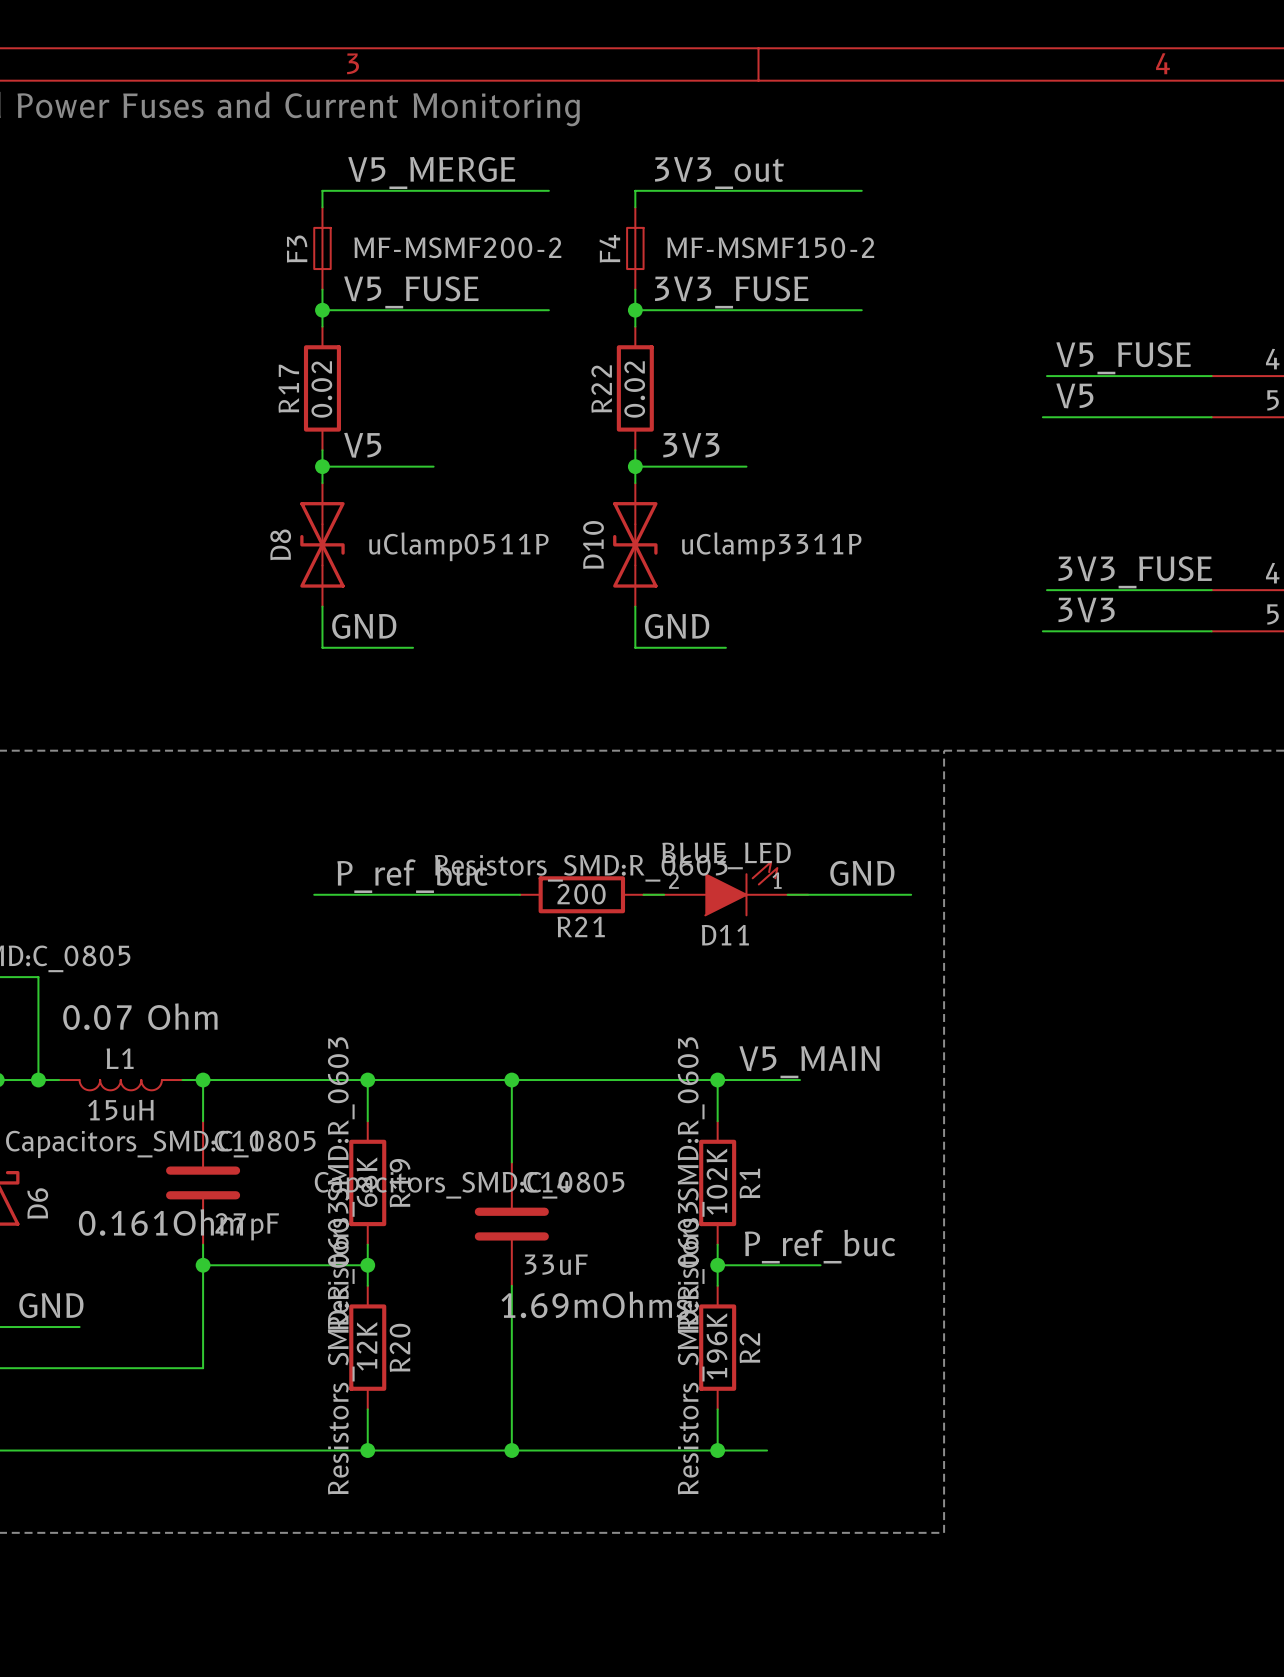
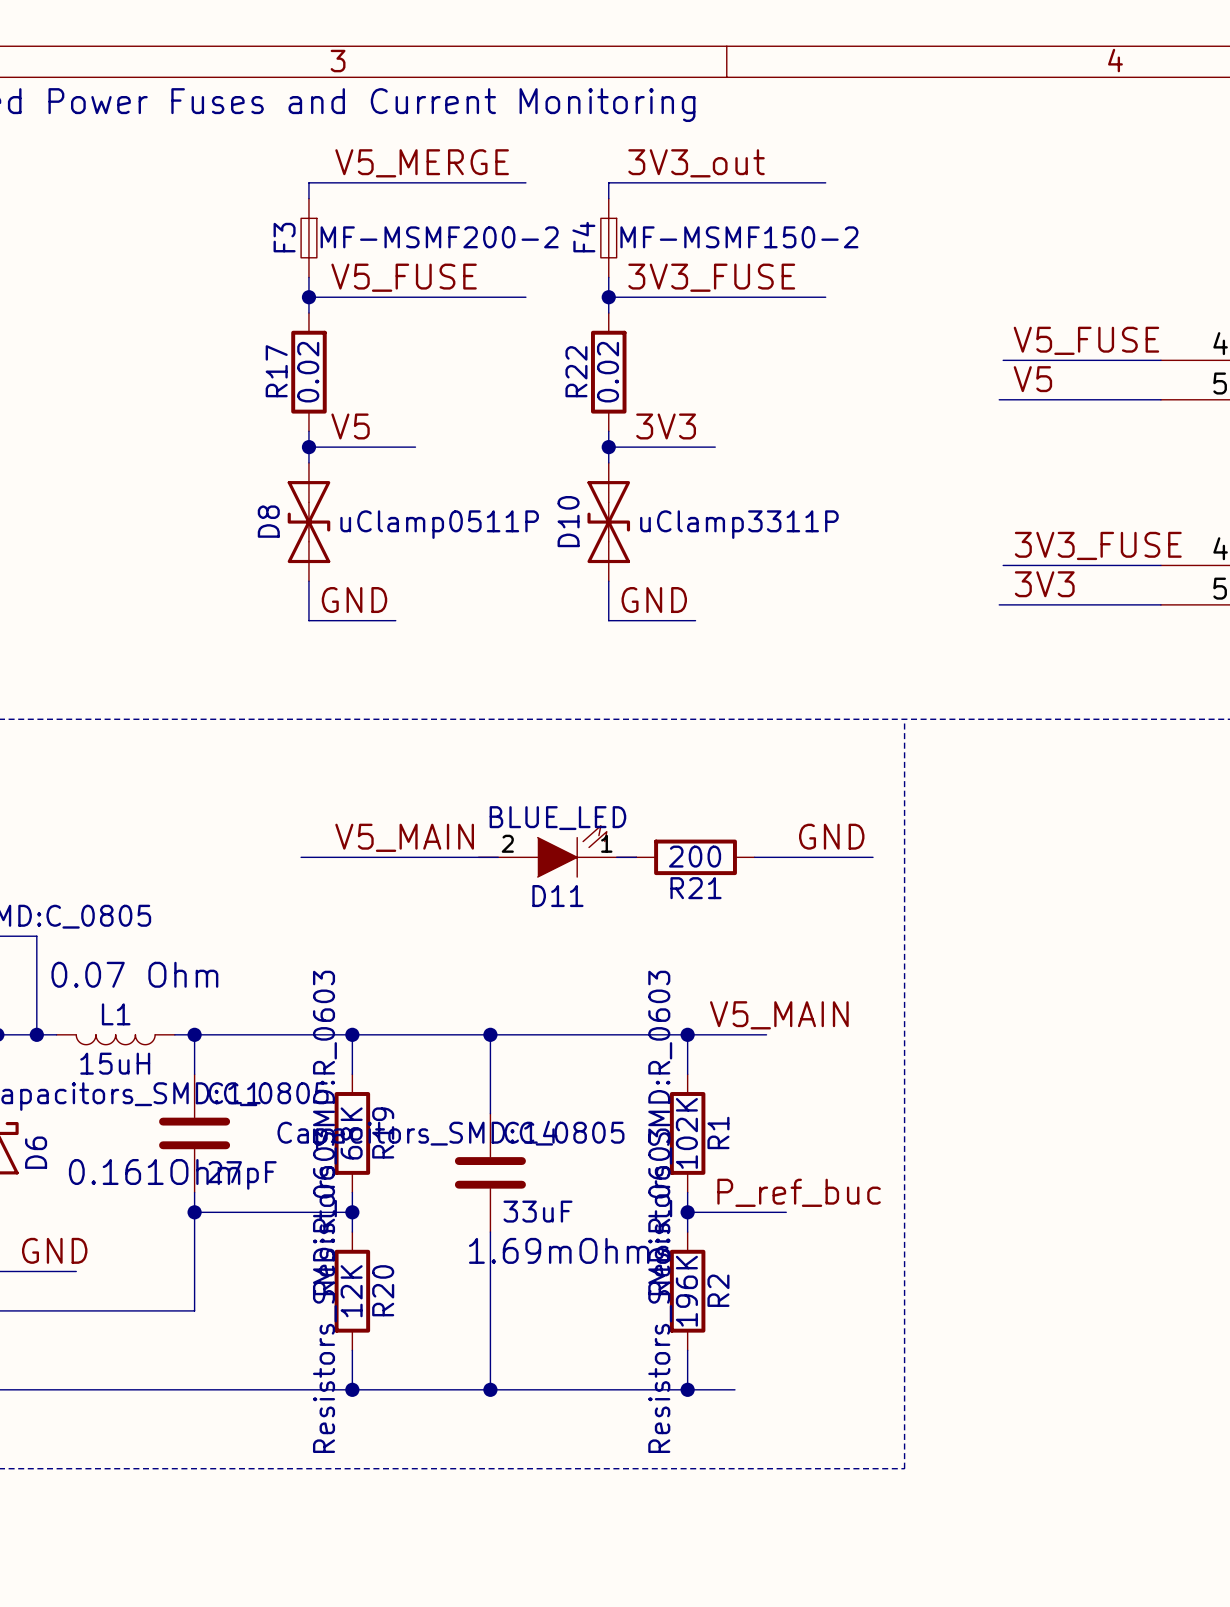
R21 text: Resistors_SMD:R_0603 (581, 868) -> none
label: P_ref_buc (412, 876) -> V5_MAIN (404, 837)
D11 position: (725, 888) -> (557, 851)
R21 position: (581, 894) -> (695, 857)

